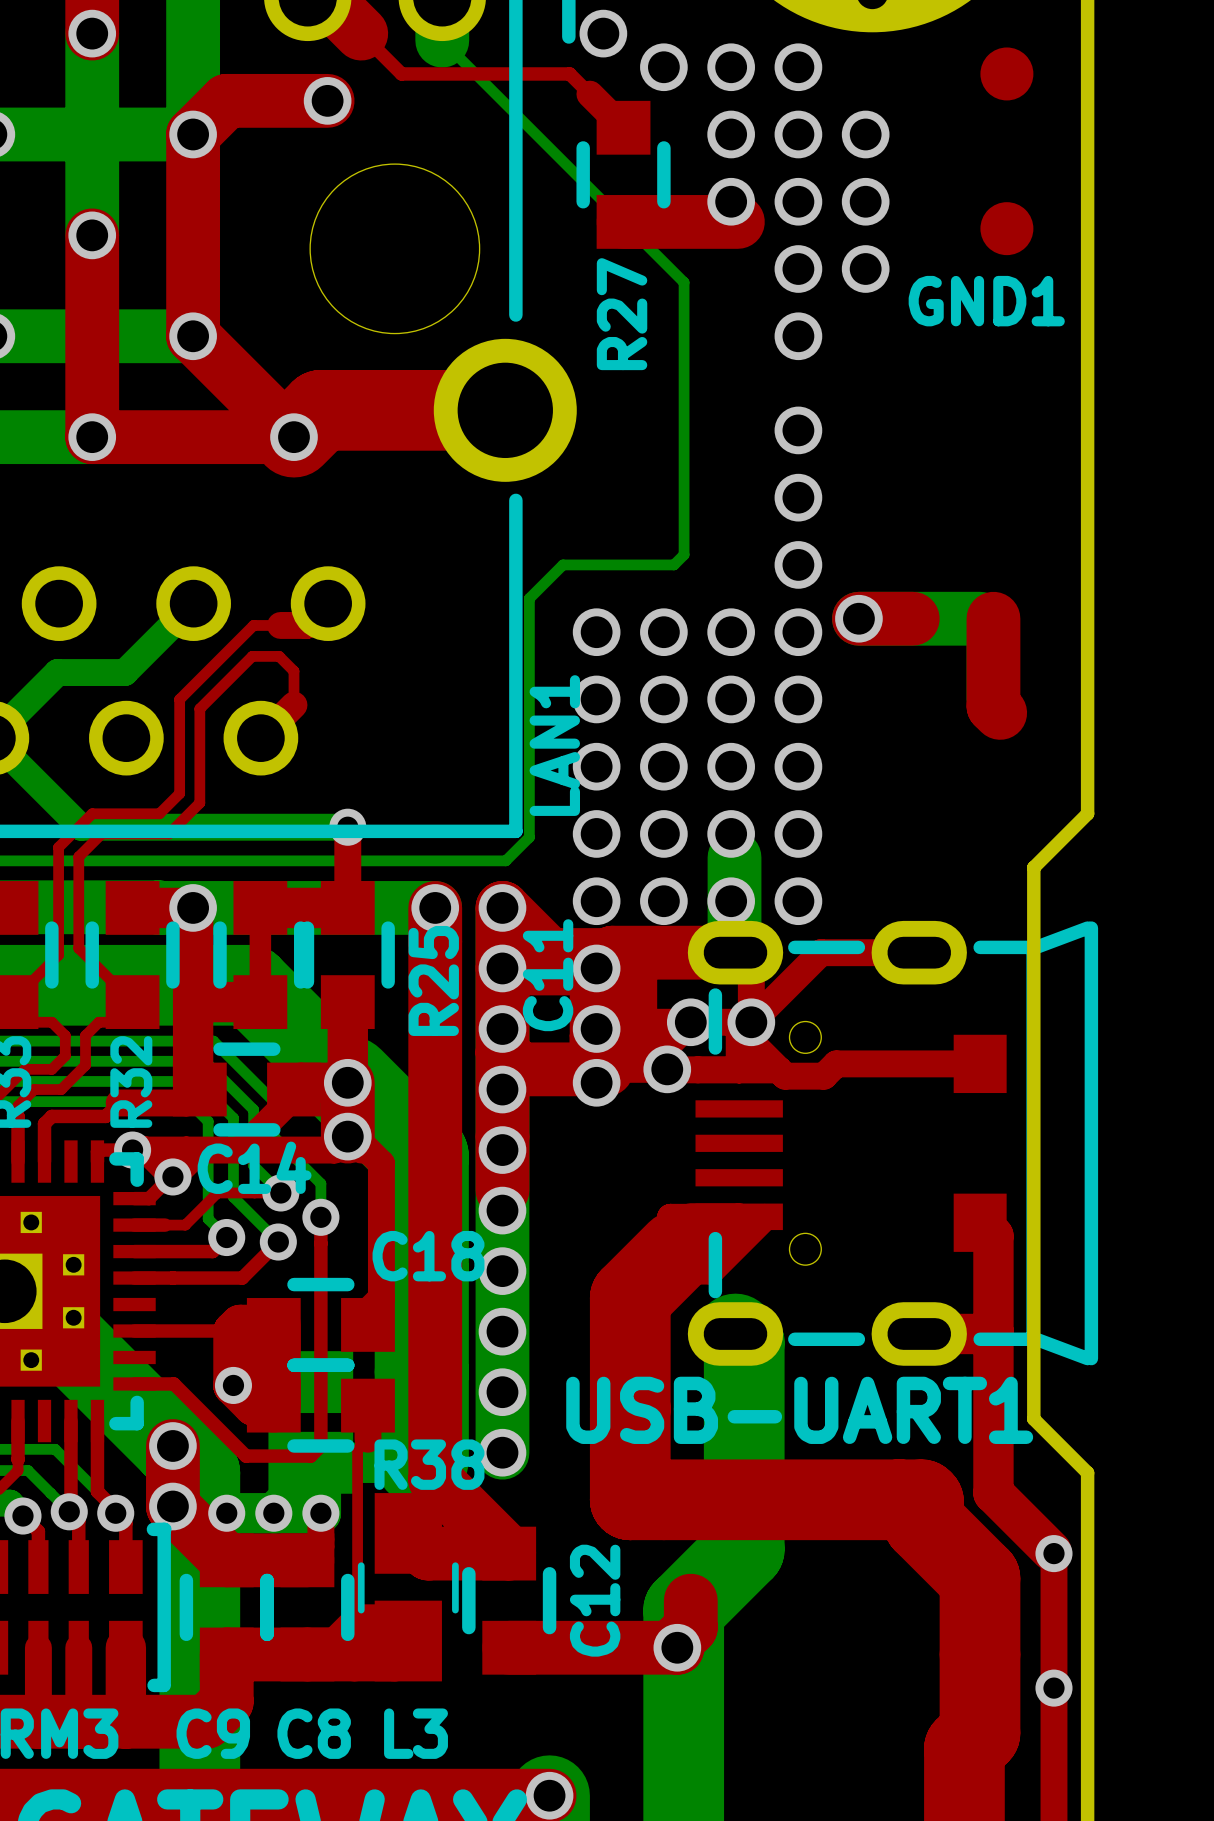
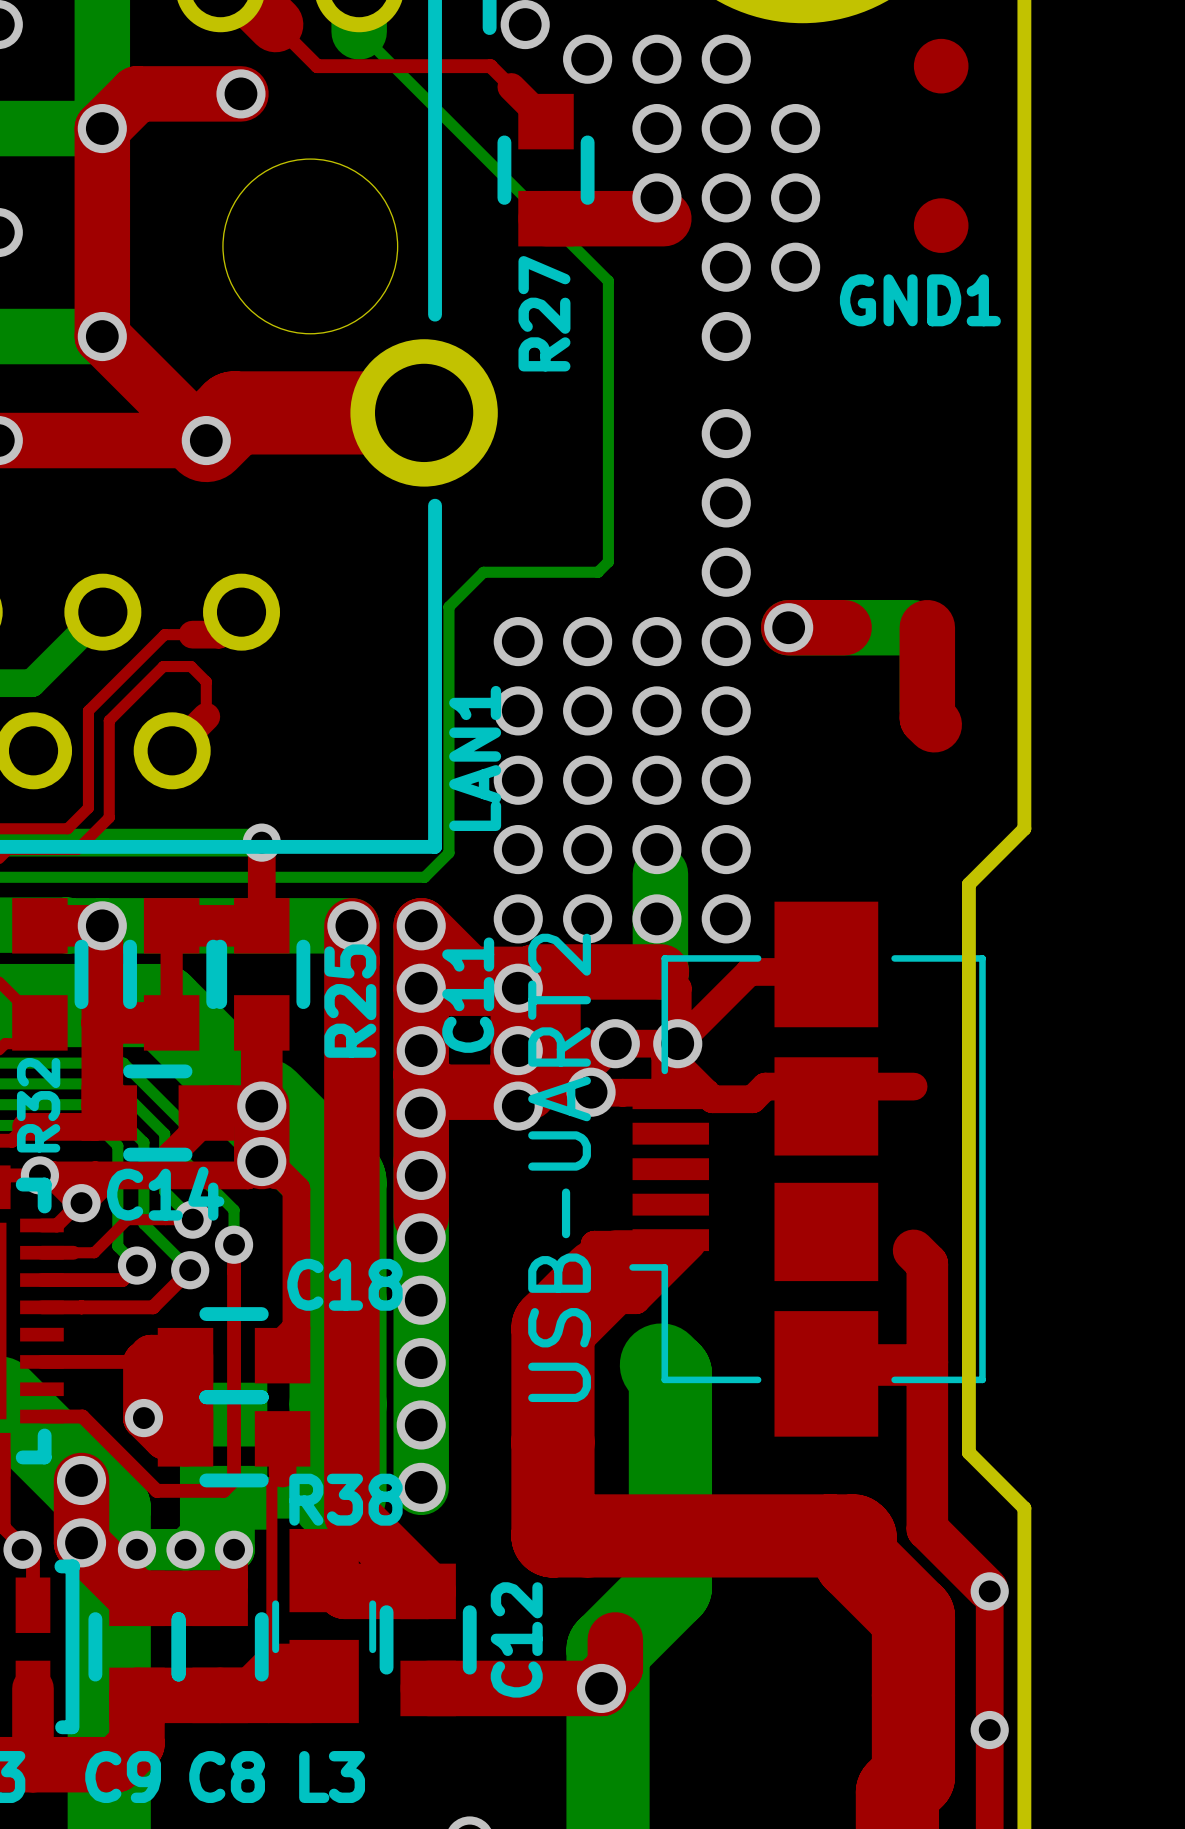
USB-UART1: (892, 1143) -> none
USB-UART2: none -> (807, 1169)

